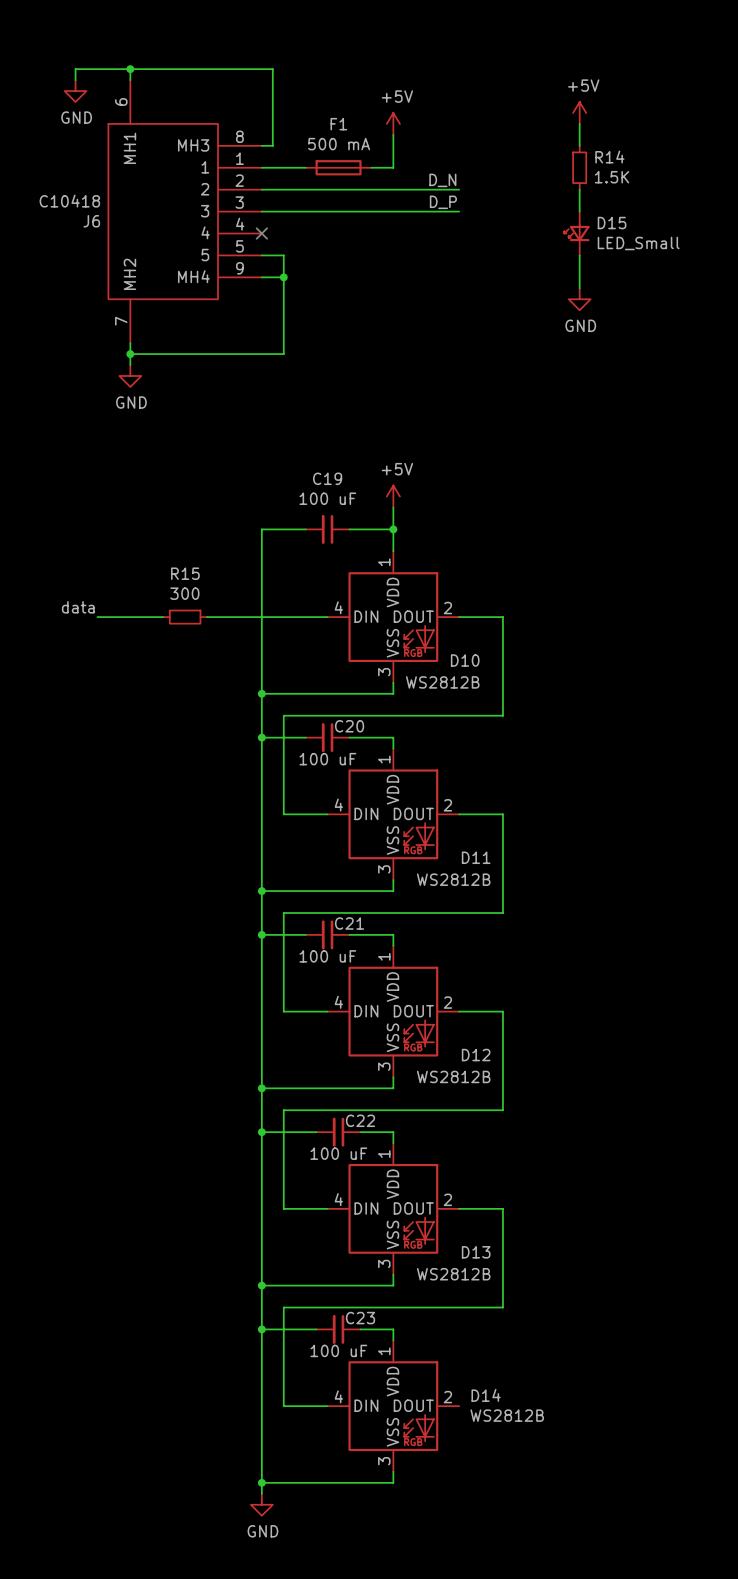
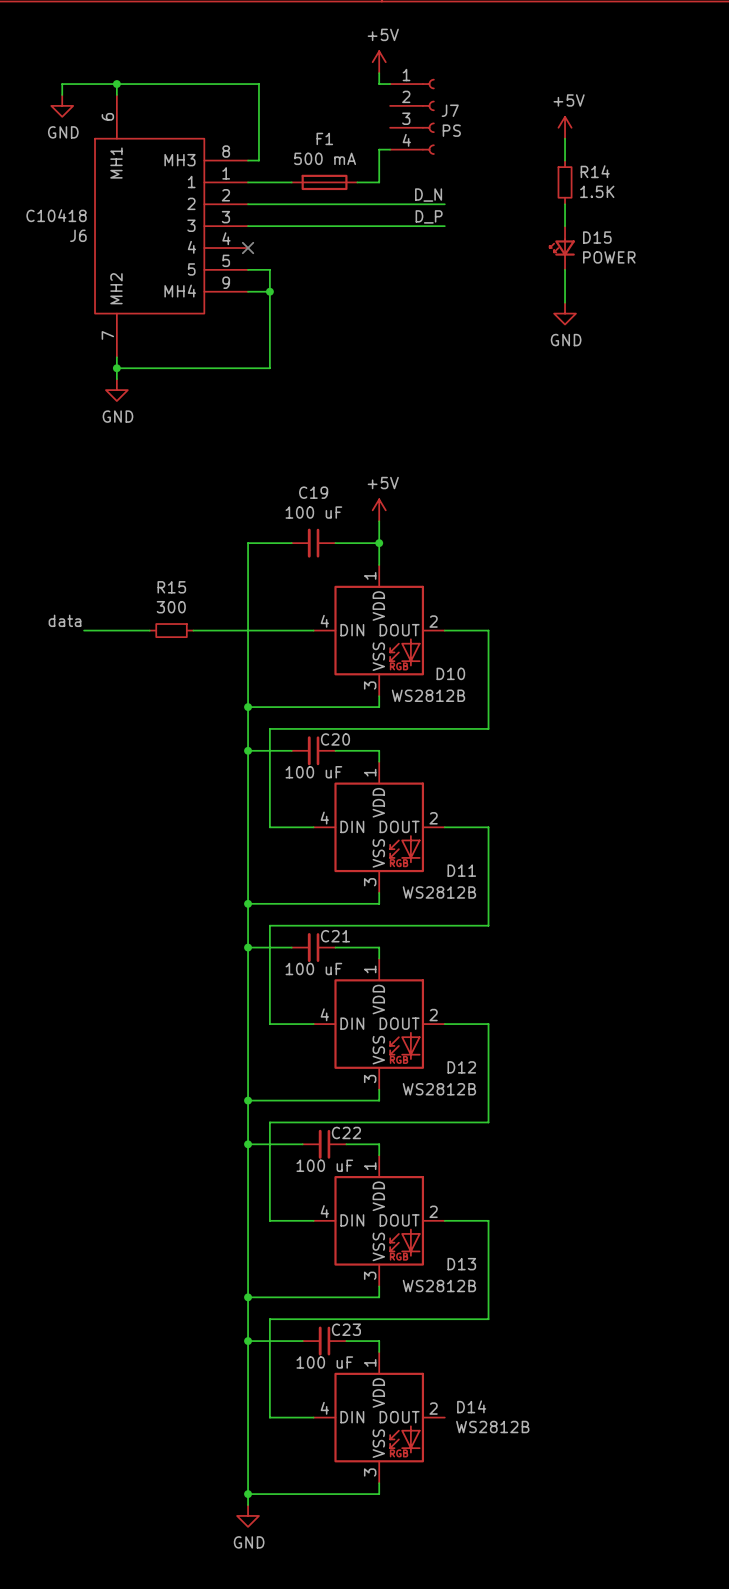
wire: none -> (379, 73) (379, 84) (390, 84)
J7: none -> PS (412, 116)
power symbol position: +5V (393, 123) -> +5V (379, 62)
wire: none -> (379, 149) (390, 149)
D15 value: LED_Small (638, 243) -> POWER (609, 257)

